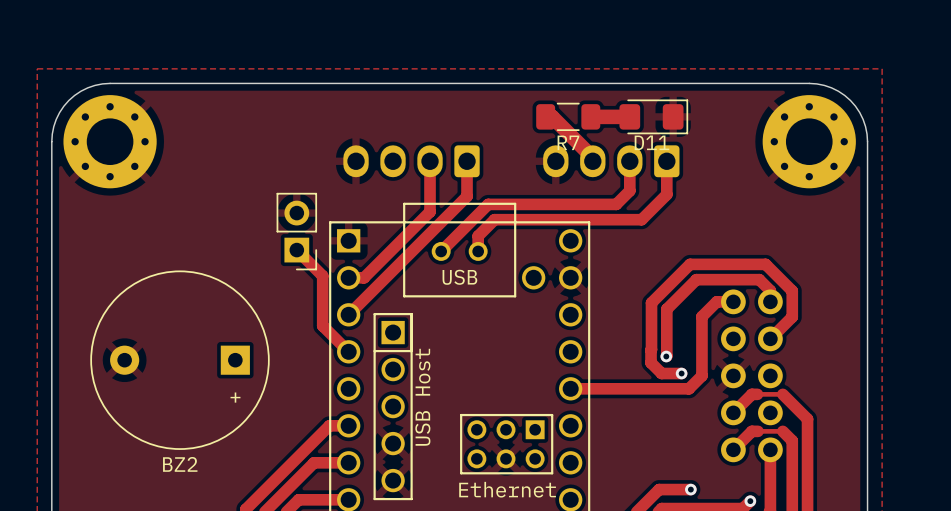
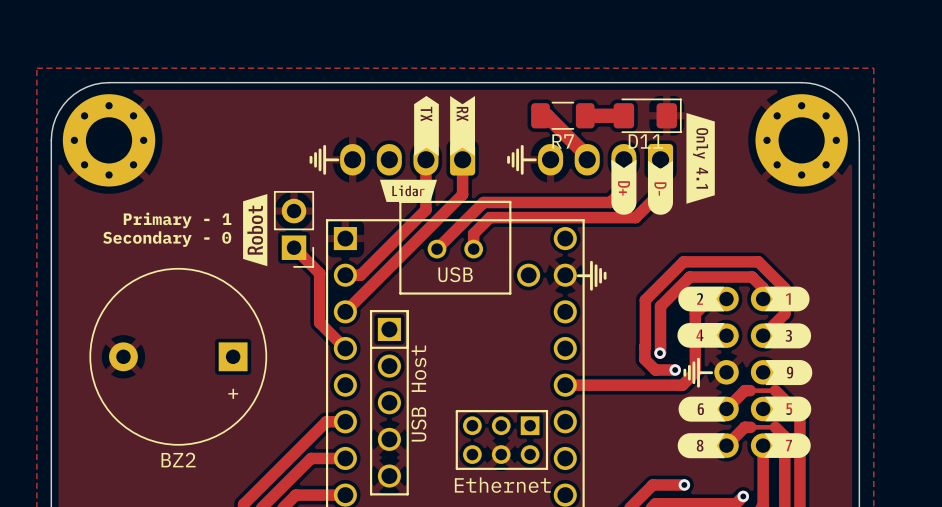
drawing: none -> [414, 95, 475, 156]
drawing: none -> [611, 113, 715, 215]
drawing: none -> [309, 144, 340, 175]
drawing: none -> [507, 144, 537, 175]
drawing: none -> [379, 179, 438, 202]
drawing: none -> [243, 194, 268, 267]
text: none -> Primary - 1 (177, 220)
text: none -> Secondary - 0 (167, 239)
drawing: none -> [576, 260, 607, 291]
drawing: none -> [677, 286, 726, 459]
drawing: none -> [764, 286, 813, 458]

